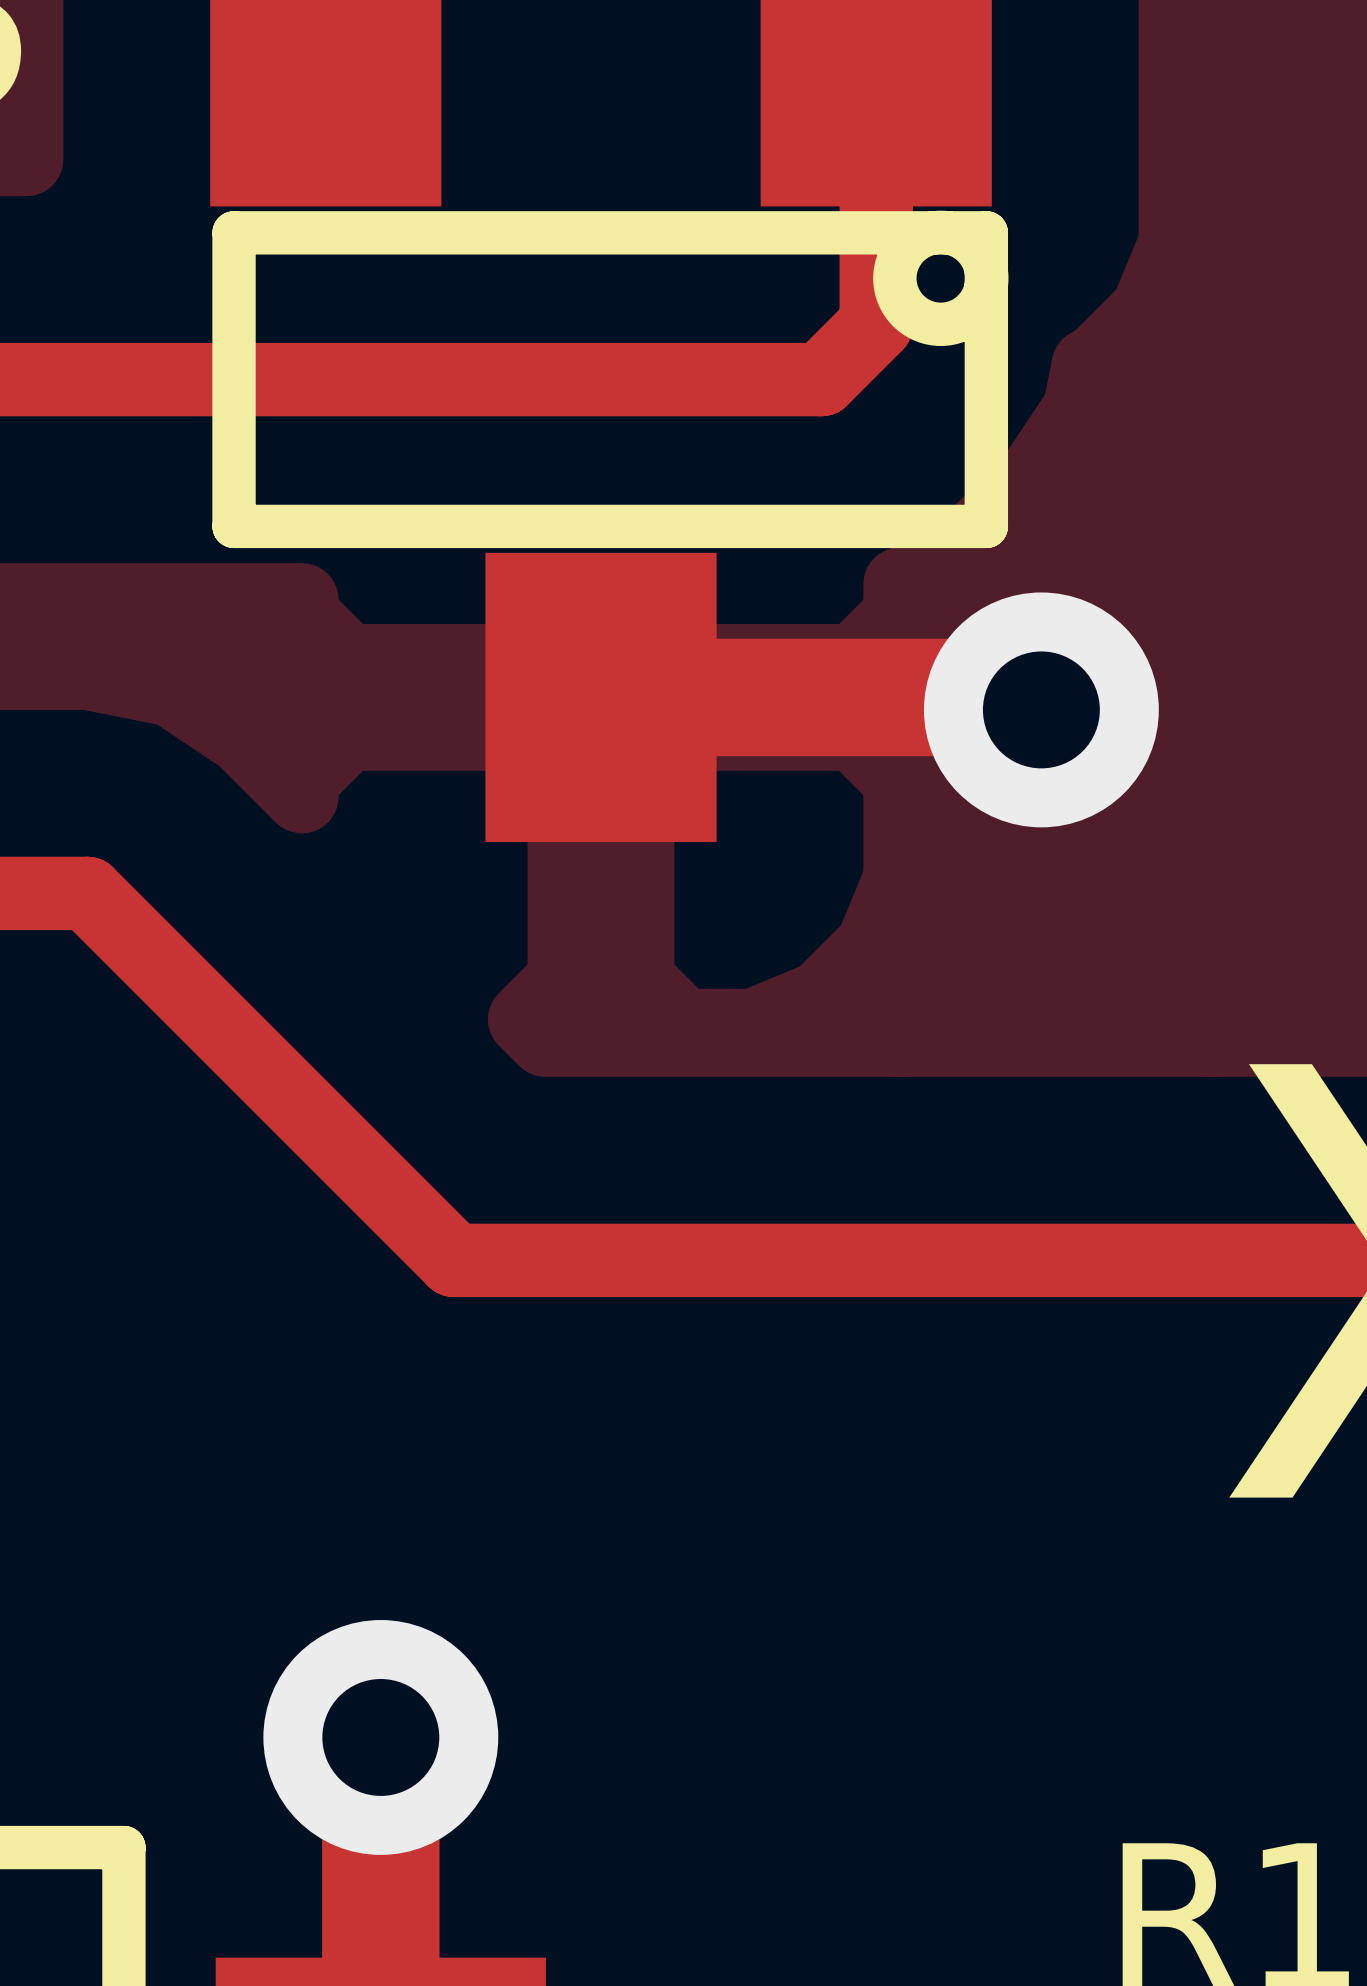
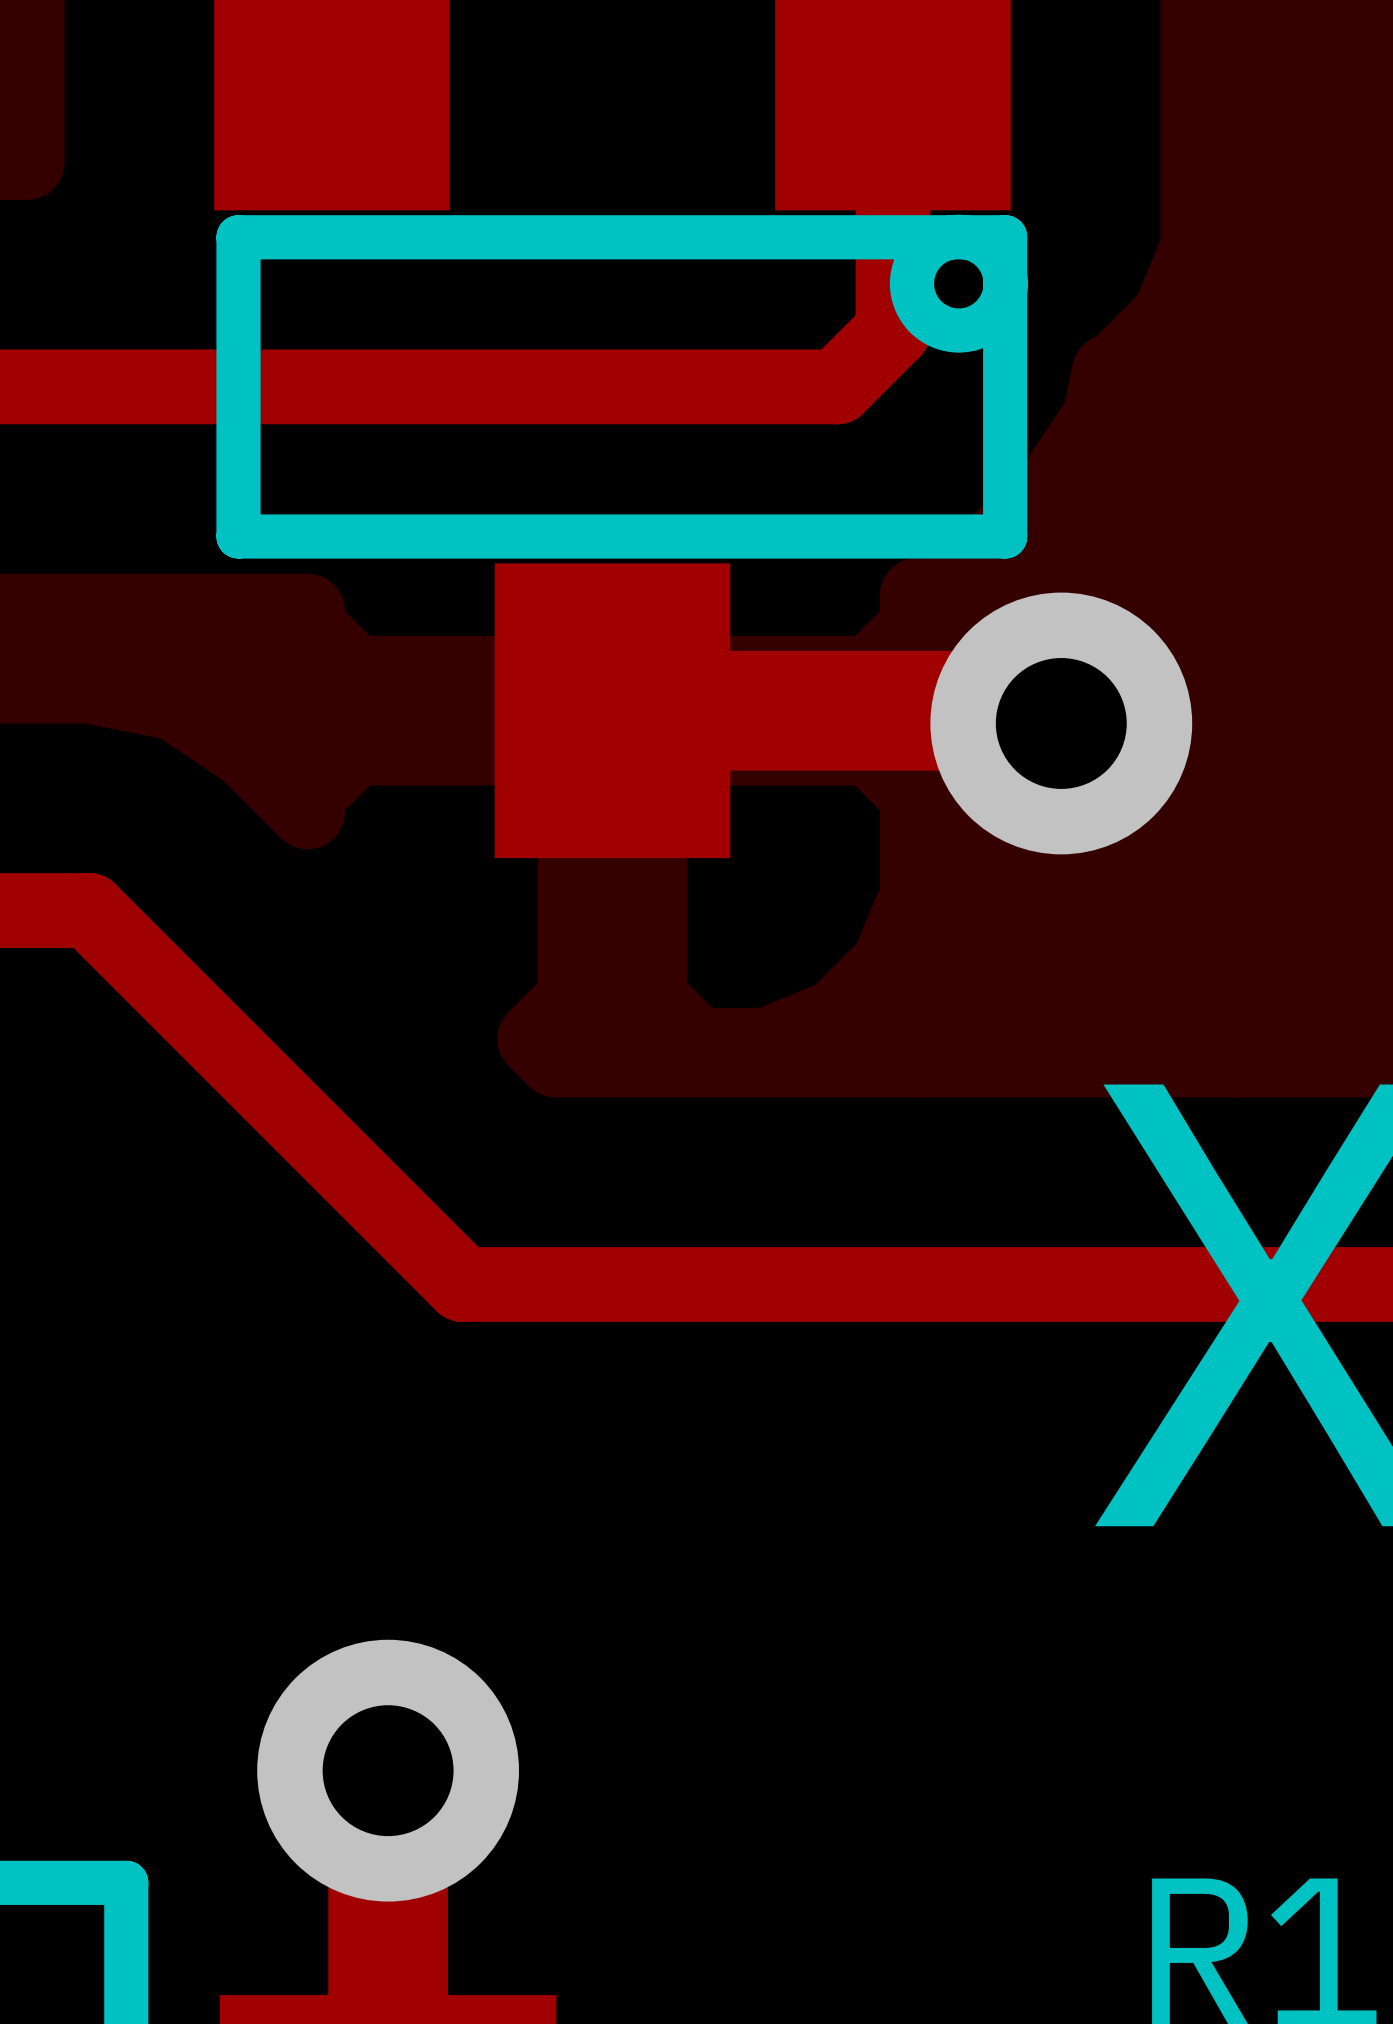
via size: [923, 592, 1159, 828] -> [930, 592, 1193, 855]
via size: [263, 1620, 499, 1855] -> [257, 1639, 520, 1902]

